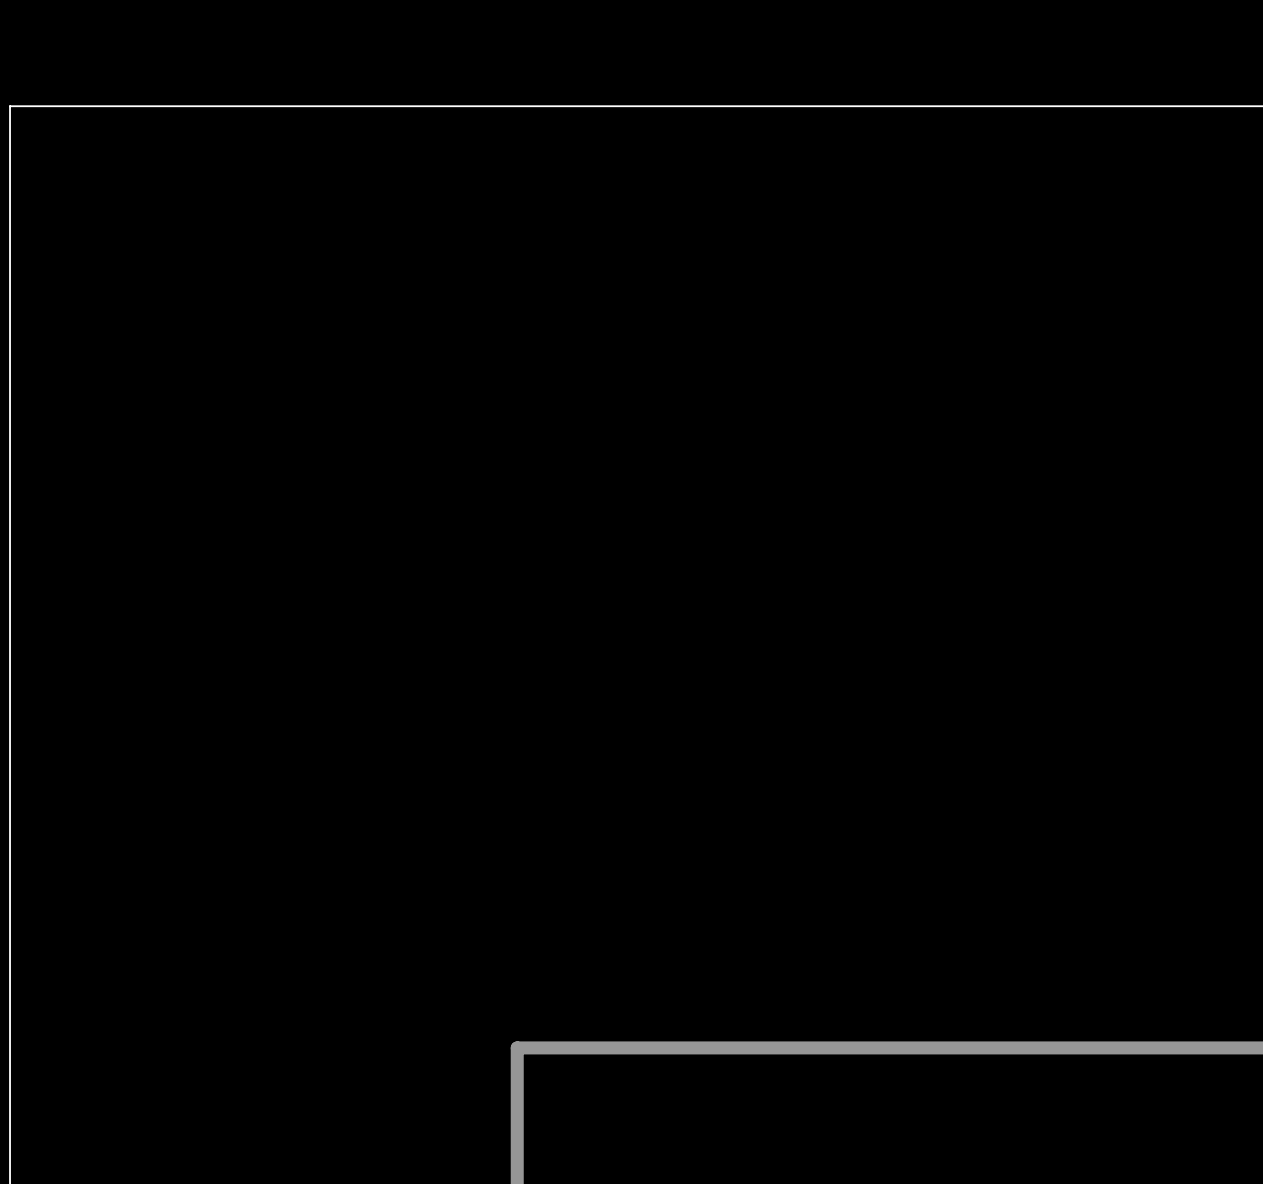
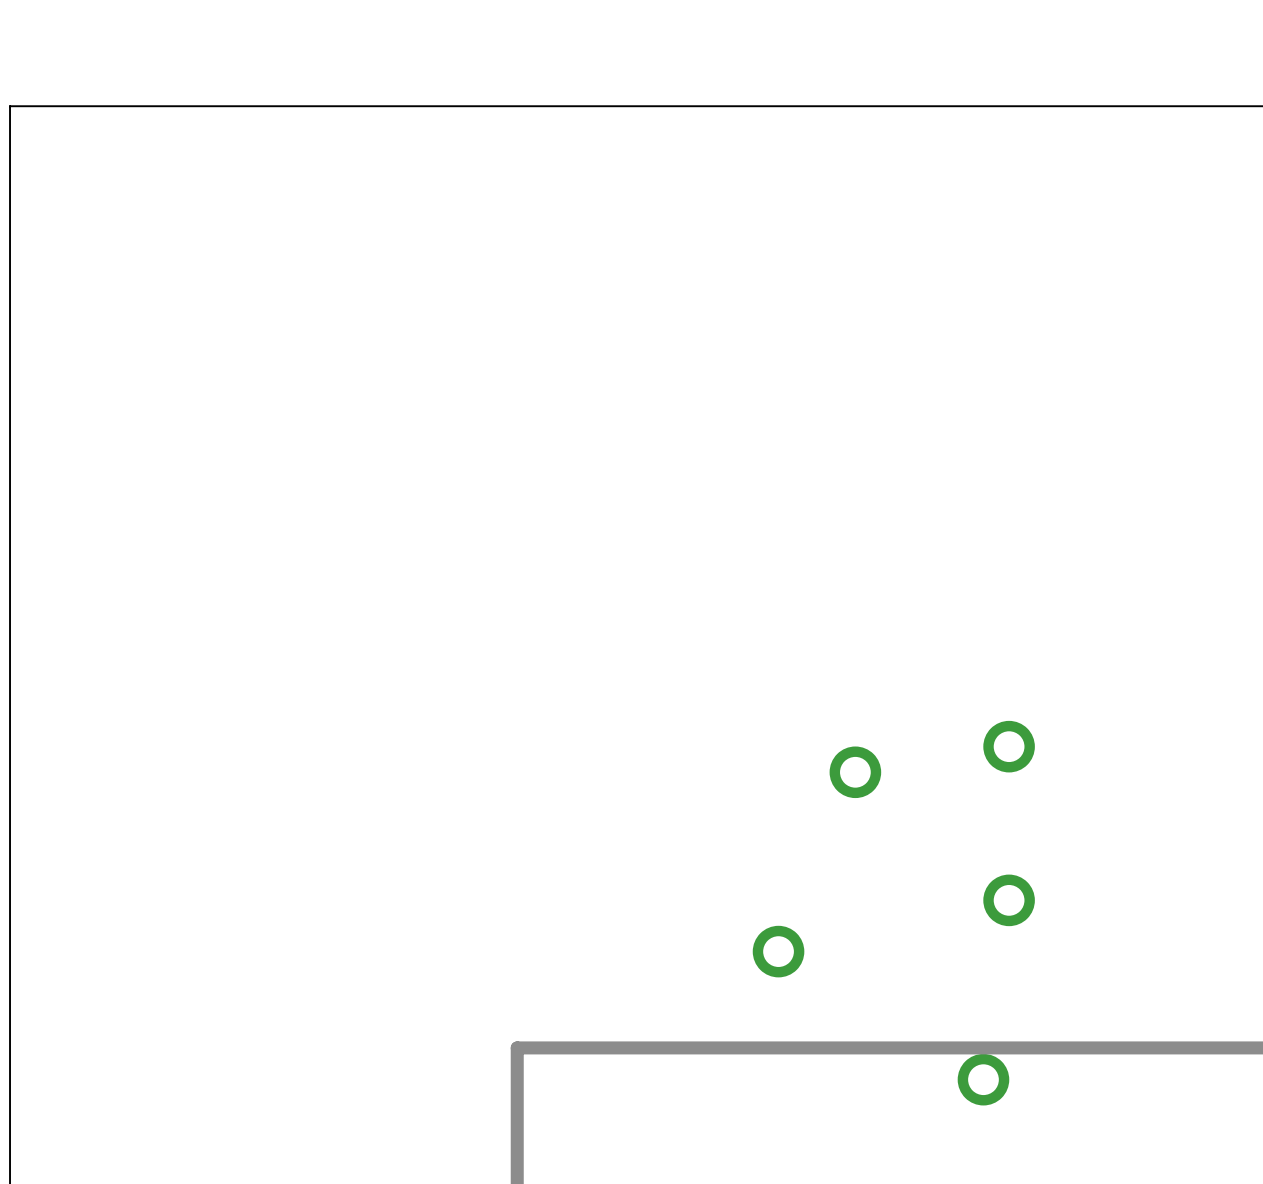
via: none -> (1009, 746)
via: none -> (855, 772)
via: none -> (1009, 900)
via: none -> (778, 951)
via: none -> (983, 1079)

